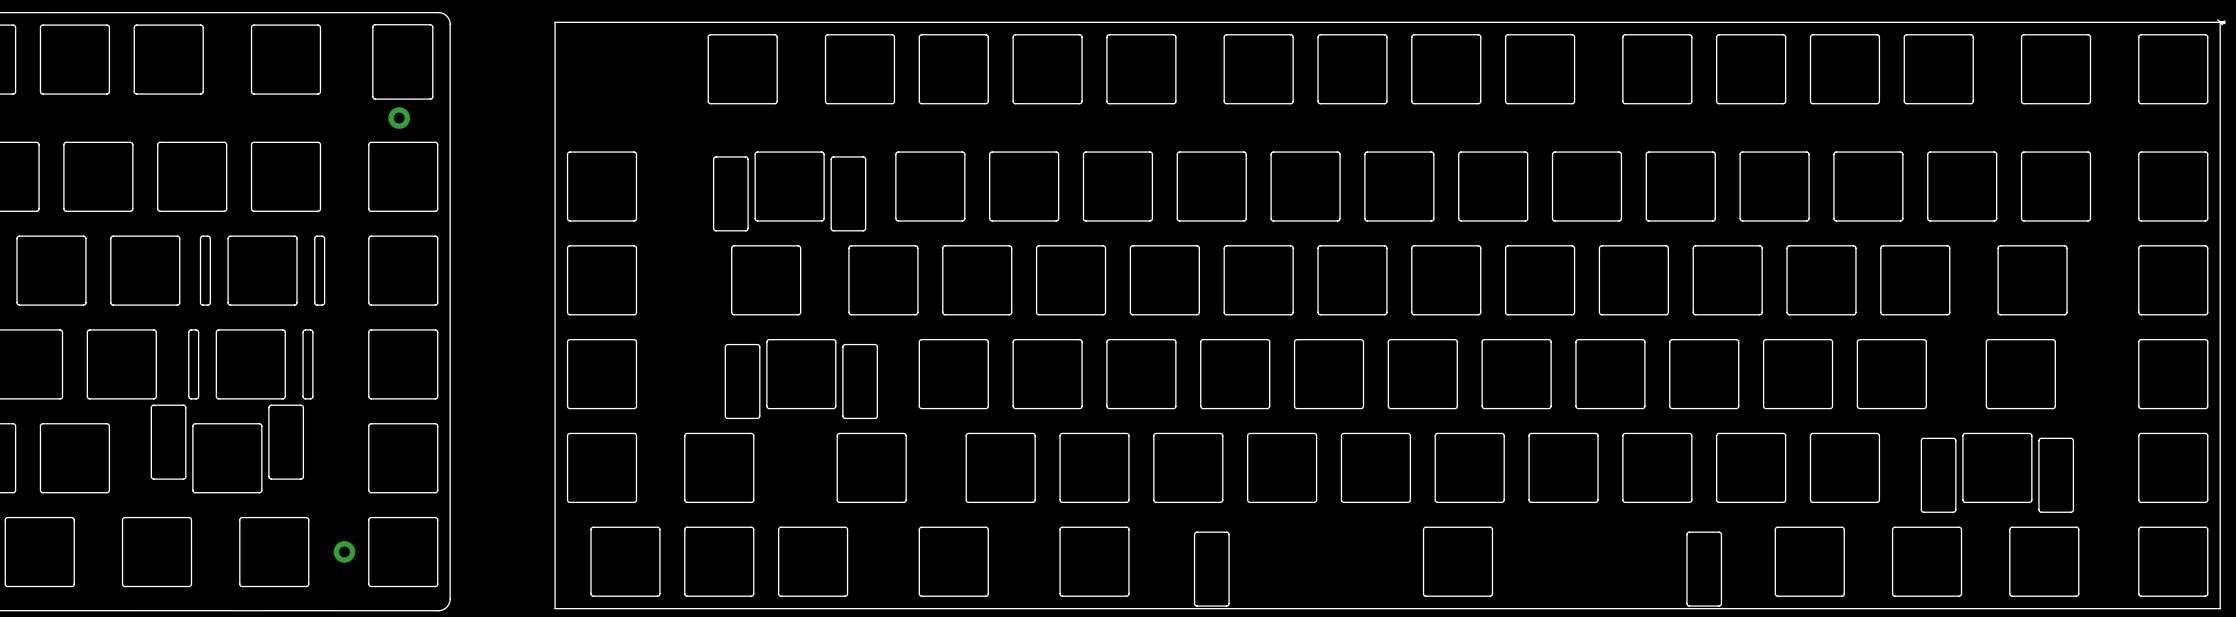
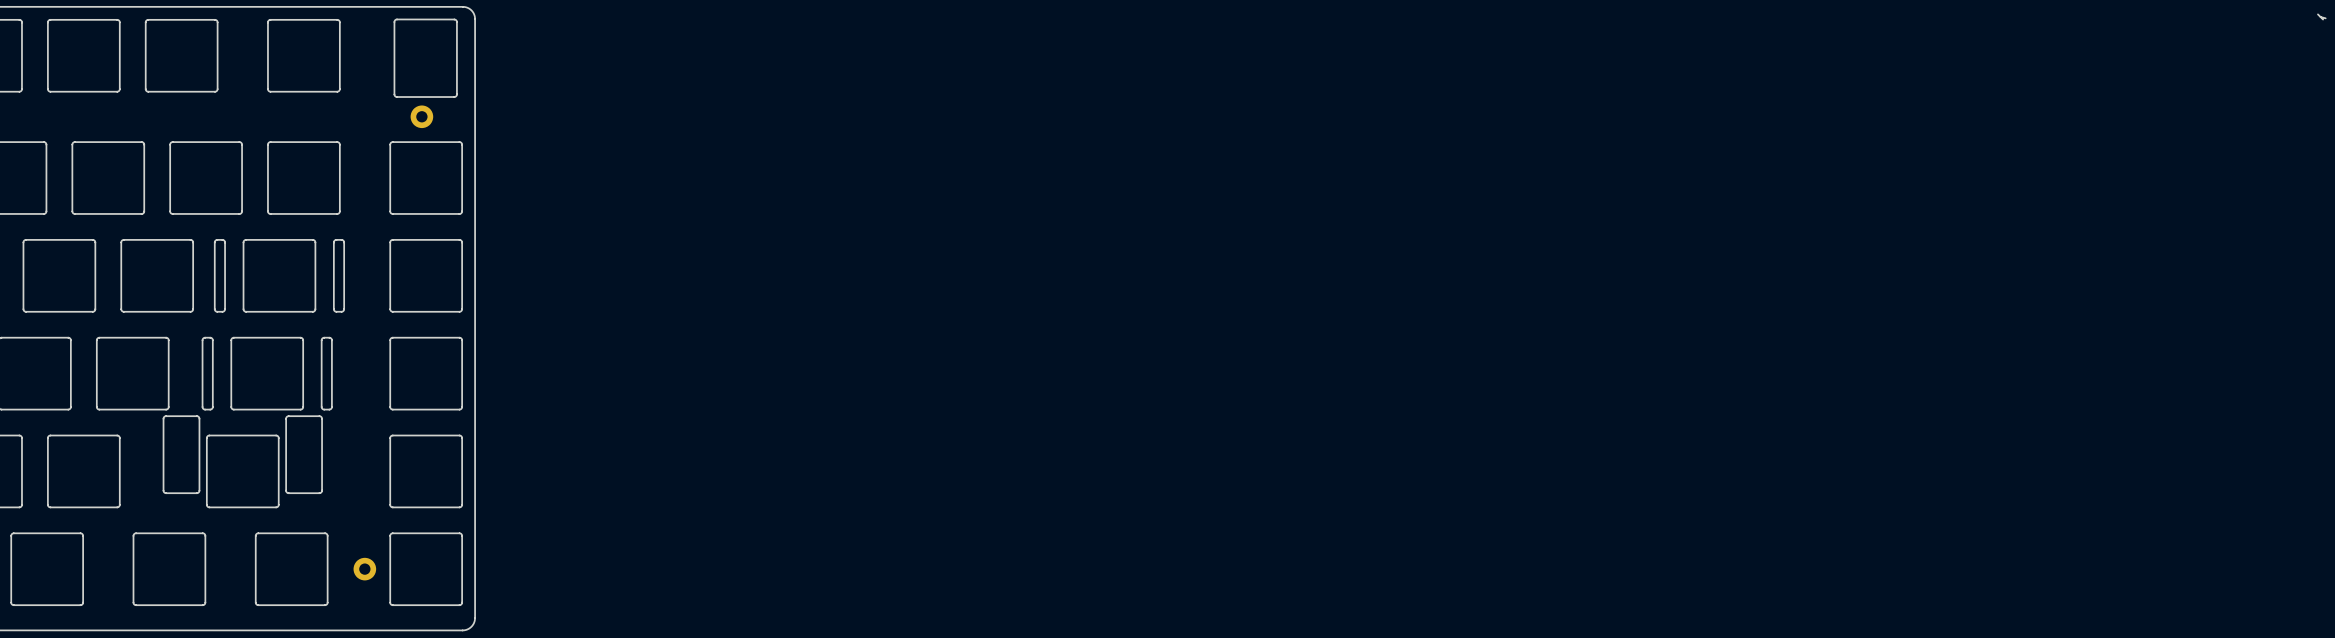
board edge: (2225, 21) (2220, 22) (2220, 608) (555, 608) (555, 22) (2225, 22) -> none
board edge: (774, 34) (708, 35) (708, 102) (776, 102) (777, 37) (774, 34) -> none
board edge: (891, 34) (826, 35) (826, 102) (893, 102) (894, 37) (891, 34) -> none
board edge: (985, 34) (920, 35) (920, 102) (987, 102) (988, 37) (985, 34) -> none
board edge: (1079, 34) (1013, 35) (1013, 102) (1081, 102) (1082, 37) (1079, 34) -> none
board edge: (1173, 34) (1107, 35) (1107, 102) (1175, 102) (1175, 37) (1173, 34) -> none
board edge: (1290, 34) (1224, 35) (1224, 102) (1292, 102) (1293, 37) (1290, 34) -> none
board edge: (1384, 34) (1318, 35) (1318, 102) (1386, 102) (1386, 37) (1384, 34) -> none
board edge: (1478, 34) (1412, 35) (1412, 102) (1480, 102) (1480, 37) (1478, 34) -> none
board edge: (1572, 34) (1506, 35) (1506, 102) (1573, 102) (1574, 37) (1572, 34) -> none
board edge: (1689, 34) (1623, 35) (1623, 102) (1691, 102) (1691, 37) (1689, 34) -> none
board edge: (1783, 34) (1717, 35) (1717, 102) (1784, 102) (1785, 37) (1783, 34) -> none
board edge: (1876, 34) (1811, 35) (1811, 102) (1878, 102) (1879, 37) (1876, 34) -> none
board edge: (1970, 34) (1905, 35) (1905, 102) (1972, 102) (1973, 37) (1970, 34) -> none
board edge: (2088, 34) (2022, 35) (2022, 102) (2089, 102) (2090, 37) (2088, 34) -> none
board edge: (2205, 34) (2139, 35) (2139, 102) (2207, 102) (2207, 37) (2205, 34) -> none
board edge: (634, 152) (568, 152) (568, 220) (635, 220) (636, 154) (634, 152) -> none
board edge: (821, 152) (755, 152) (755, 220) (823, 220) (824, 154) (821, 152) -> none
board edge: (962, 152) (896, 152) (896, 220) (964, 220) (964, 154) (962, 152) -> none
board edge: (1056, 152) (990, 152) (990, 220) (1057, 220) (1058, 154) (1056, 152) -> none
board edge: (1149, 152) (1084, 152) (1084, 220) (1151, 220) (1152, 154) (1149, 152) -> none
board edge: (1243, 152) (1178, 152) (1178, 220) (1245, 220) (1246, 154) (1243, 152) -> none
board edge: (1337, 152) (1271, 152) (1271, 220) (1339, 220) (1340, 154) (1337, 152) -> none
board edge: (1431, 152) (1365, 152) (1365, 220) (1433, 220) (1433, 154) (1431, 152) -> none
board edge: (1525, 152) (1459, 152) (1459, 220) (1526, 220) (1527, 154) (1525, 152) -> none
board edge: (1618, 152) (1553, 152) (1553, 220) (1620, 220) (1621, 154) (1618, 152) -> none
board edge: (1712, 152) (1647, 152) (1647, 220) (1714, 220) (1715, 154) (1712, 152) -> none
board edge: (1806, 152) (1740, 152) (1740, 220) (1808, 220) (1809, 154) (1806, 152) -> none
board edge: (1900, 152) (1834, 152) (1834, 220) (1902, 220) (1902, 154) (1900, 152) -> none
board edge: (1994, 152) (1928, 152) (1928, 220) (1995, 220) (1996, 154) (1994, 152) -> none
board edge: (2088, 152) (2022, 152) (2022, 220) (2089, 220) (2090, 154) (2088, 152) -> none
board edge: (2205, 152) (2139, 152) (2139, 220) (2207, 220) (2207, 154) (2205, 152) -> none
board edge: (745, 156) (713, 158) (715, 230) (747, 229) (748, 159) (745, 156) -> none
board edge: (863, 156) (831, 158) (832, 230) (865, 229) (865, 159) (863, 156) -> none
board edge: (634, 245) (568, 246) (568, 314) (635, 314) (636, 248) (634, 245) -> none
board edge: (798, 245) (732, 246) (732, 314) (799, 314) (800, 248) (798, 245) -> none
board edge: (915, 245) (849, 246) (849, 314) (917, 314) (917, 248) (915, 245) -> none
board edge: (1009, 245) (943, 246) (943, 314) (1010, 314) (1011, 248) (1009, 245) -> none
board edge: (1103, 245) (1037, 246) (1037, 314) (1104, 314) (1105, 248) (1103, 245) -> none
board edge: (1196, 245) (1131, 246) (1131, 314) (1198, 314) (1199, 248) (1196, 245) -> none
board edge: (1290, 245) (1224, 246) (1224, 314) (1292, 314) (1293, 248) (1290, 245) -> none
board edge: (1384, 245) (1318, 246) (1318, 314) (1386, 314) (1386, 248) (1384, 245) -> none
board edge: (1478, 245) (1412, 246) (1412, 314) (1480, 314) (1480, 248) (1478, 245) -> none
board edge: (1572, 245) (1506, 246) (1506, 314) (1573, 314) (1574, 248) (1572, 245) -> none
board edge: (1665, 245) (1600, 246) (1600, 314) (1667, 314) (1668, 248) (1665, 245) -> none
board edge: (1759, 245) (1693, 246) (1693, 314) (1761, 314) (1762, 248) (1759, 245) -> none
board edge: (1853, 245) (1787, 246) (1787, 314) (1855, 314) (1855, 248) (1853, 245) -> none
board edge: (1947, 245) (1881, 246) (1881, 314) (1949, 314) (1949, 248) (1947, 245) -> none
board edge: (2064, 245) (1998, 246) (1998, 314) (2066, 314) (2067, 248) (2064, 245) -> none
board edge: (2205, 245) (2139, 246) (2139, 314) (2207, 314) (2207, 248) (2205, 245) -> none
board edge: (634, 339) (568, 340) (568, 407) (635, 407) (636, 342) (634, 339) -> none
board edge: (833, 339) (767, 340) (767, 407) (835, 407) (835, 342) (833, 339) -> none
board edge: (985, 339) (920, 340) (920, 407) (987, 407) (988, 342) (985, 339) -> none
board edge: (1079, 339) (1013, 340) (1013, 407) (1081, 407) (1082, 342) (1079, 339) -> none
board edge: (1173, 339) (1107, 340) (1107, 407) (1175, 407) (1175, 342) (1173, 339) -> none
board edge: (1267, 339) (1201, 340) (1201, 407) (1268, 407) (1269, 342) (1267, 339) -> none
board edge: (1361, 339) (1295, 340) (1295, 407) (1362, 407) (1363, 342) (1361, 339) -> none
board edge: (1454, 339) (1389, 340) (1389, 407) (1456, 407) (1457, 342) (1454, 339) -> none
board edge: (1548, 339) (1482, 340) (1482, 407) (1550, 407) (1551, 342) (1548, 339) -> none
board edge: (1642, 339) (1576, 340) (1576, 407) (1644, 407) (1644, 342) (1642, 339) -> none
board edge: (1736, 339) (1670, 340) (1670, 407) (1737, 407) (1738, 342) (1736, 339) -> none
board edge: (1830, 339) (1764, 340) (1764, 407) (1831, 407) (1832, 342) (1830, 339) -> none
board edge: (1923, 339) (1858, 340) (1858, 407) (1925, 407) (1926, 342) (1923, 339) -> none
board edge: (2052, 339) (1987, 340) (1987, 407) (2054, 407) (2055, 342) (2052, 339) -> none
board edge: (2205, 339) (2139, 340) (2139, 407) (2207, 407) (2207, 342) (2205, 339) -> none
board edge: (757, 344) (725, 346) (726, 418) (759, 416) (759, 347) (757, 344) -> none
board edge: (874, 344) (843, 346) (844, 418) (877, 416) (877, 347) (874, 344) -> none
board edge: (634, 433) (568, 434) (568, 501) (635, 501) (636, 435) (634, 433) -> none
board edge: (751, 433) (685, 434) (685, 501) (753, 501) (753, 435) (751, 433) -> none
board edge: (903, 433) (837, 434) (837, 501) (905, 501) (906, 435) (903, 433) -> none
board edge: (1032, 433) (966, 434) (966, 501) (1034, 501) (1035, 435) (1032, 433) -> none
board edge: (1126, 433) (1060, 434) (1060, 501) (1128, 501) (1128, 435) (1126, 433) -> none
board edge: (1220, 433) (1154, 434) (1154, 501) (1222, 501) (1222, 435) (1220, 433) -> none
board edge: (1314, 433) (1248, 434) (1248, 501) (1315, 501) (1316, 435) (1314, 433) -> none
board edge: (1407, 433) (1342, 434) (1342, 501) (1409, 501) (1410, 435) (1407, 433) -> none
board edge: (1501, 433) (1435, 434) (1435, 501) (1503, 501) (1504, 435) (1501, 433) -> none
board edge: (1595, 433) (1529, 434) (1529, 501) (1597, 501) (1598, 435) (1595, 433) -> none
board edge: (1689, 433) (1623, 434) (1623, 501) (1691, 501) (1691, 435) (1689, 433) -> none
board edge: (1783, 433) (1717, 434) (1717, 501) (1784, 501) (1785, 435) (1783, 433) -> none
board edge: (1876, 433) (1811, 434) (1811, 501) (1878, 501) (1879, 435) (1876, 433) -> none
board edge: (2029, 433) (1963, 434) (1963, 501) (2031, 501) (2031, 435) (2029, 433) -> none
board edge: (2205, 433) (2139, 434) (2139, 501) (2207, 501) (2207, 435) (2205, 433) -> none
board edge: (1953, 438) (1921, 439) (1922, 512) (1955, 510) (1955, 440) (1953, 438) -> none
board edge: (2070, 438) (2039, 439) (2040, 512) (2073, 510) (2073, 440) (2070, 438) -> none
board edge: (657, 527) (591, 527) (591, 595) (659, 595) (659, 529) (657, 527) -> none
board edge: (751, 527) (685, 527) (685, 595) (753, 595) (753, 529) (751, 527) -> none
board edge: (845, 527) (779, 527) (779, 595) (846, 595) (847, 529) (845, 527) -> none
board edge: (985, 527) (920, 527) (920, 595) (987, 595) (988, 529) (985, 527) -> none
board edge: (1126, 527) (1060, 527) (1060, 595) (1128, 595) (1128, 529) (1126, 527) -> none
board edge: (1490, 527) (1424, 527) (1424, 595) (1491, 595) (1492, 529) (1490, 527) -> none
board edge: (1841, 527) (1776, 527) (1776, 595) (1843, 595) (1844, 529) (1841, 527) -> none
board edge: (1959, 527) (1893, 527) (1893, 595) (1960, 595) (1961, 529) (1959, 527) -> none
board edge: (2076, 527) (2010, 527) (2010, 595) (2078, 595) (2078, 529) (2076, 527) -> none
board edge: (2205, 527) (2139, 527) (2139, 595) (2207, 595) (2207, 529) (2205, 527) -> none
board edge: (1226, 532) (1194, 533) (1196, 605) (1228, 604) (1229, 534) (1226, 532) -> none
board edge: (1718, 532) (1687, 533) (1688, 605) (1721, 604) (1721, 534) (1718, 532) -> none

